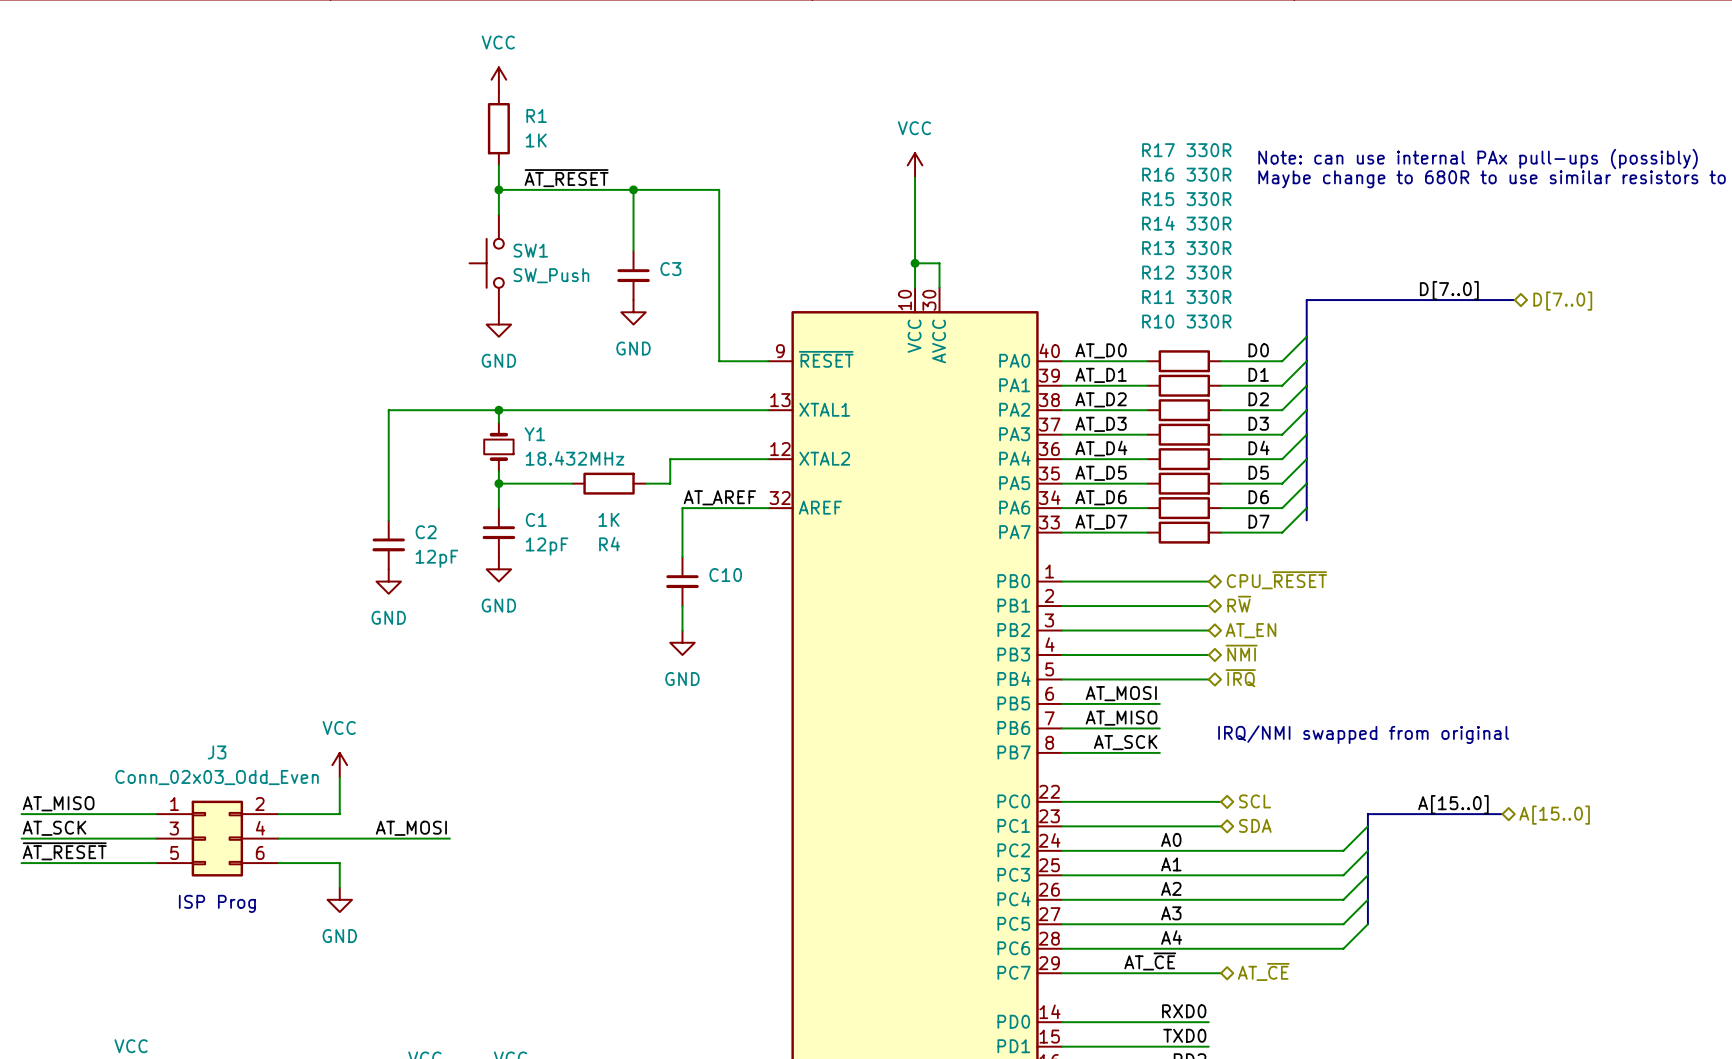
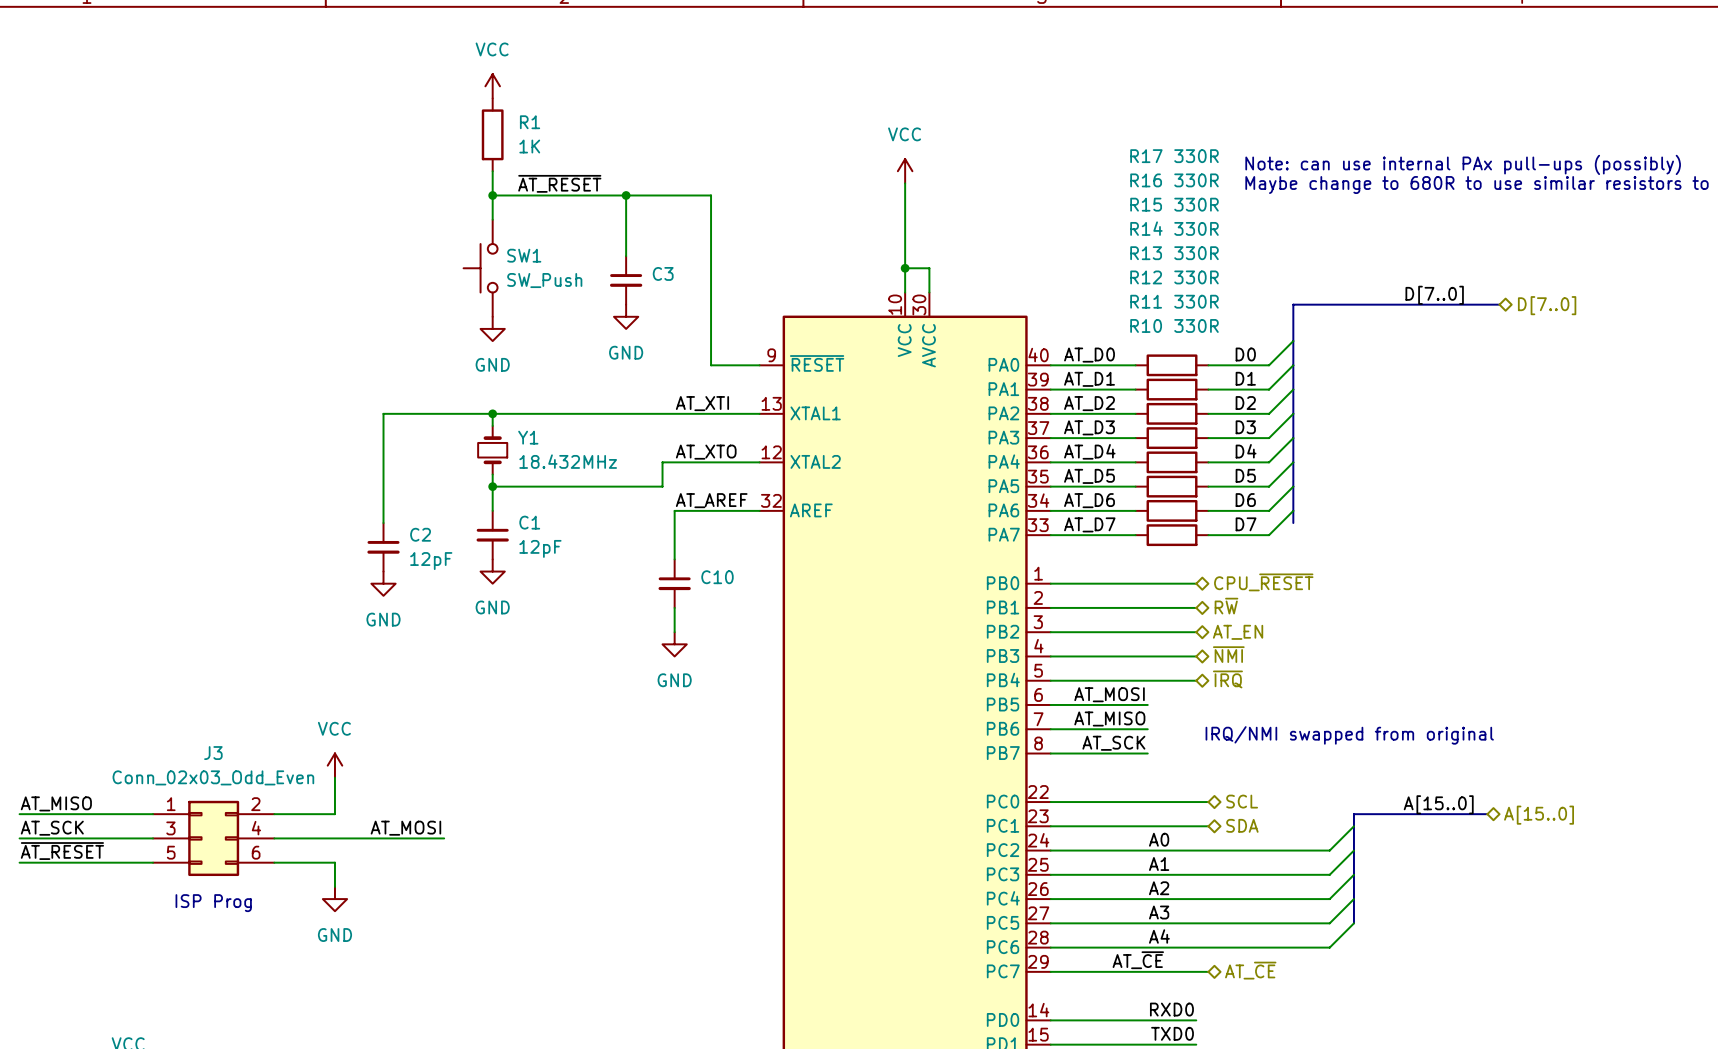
label: none -> AT_XTI (702, 403)
label: none -> AT_XTO (706, 452)
wire: none -> (565, 486) (638, 486)
R4: 1K (609, 483) -> none

